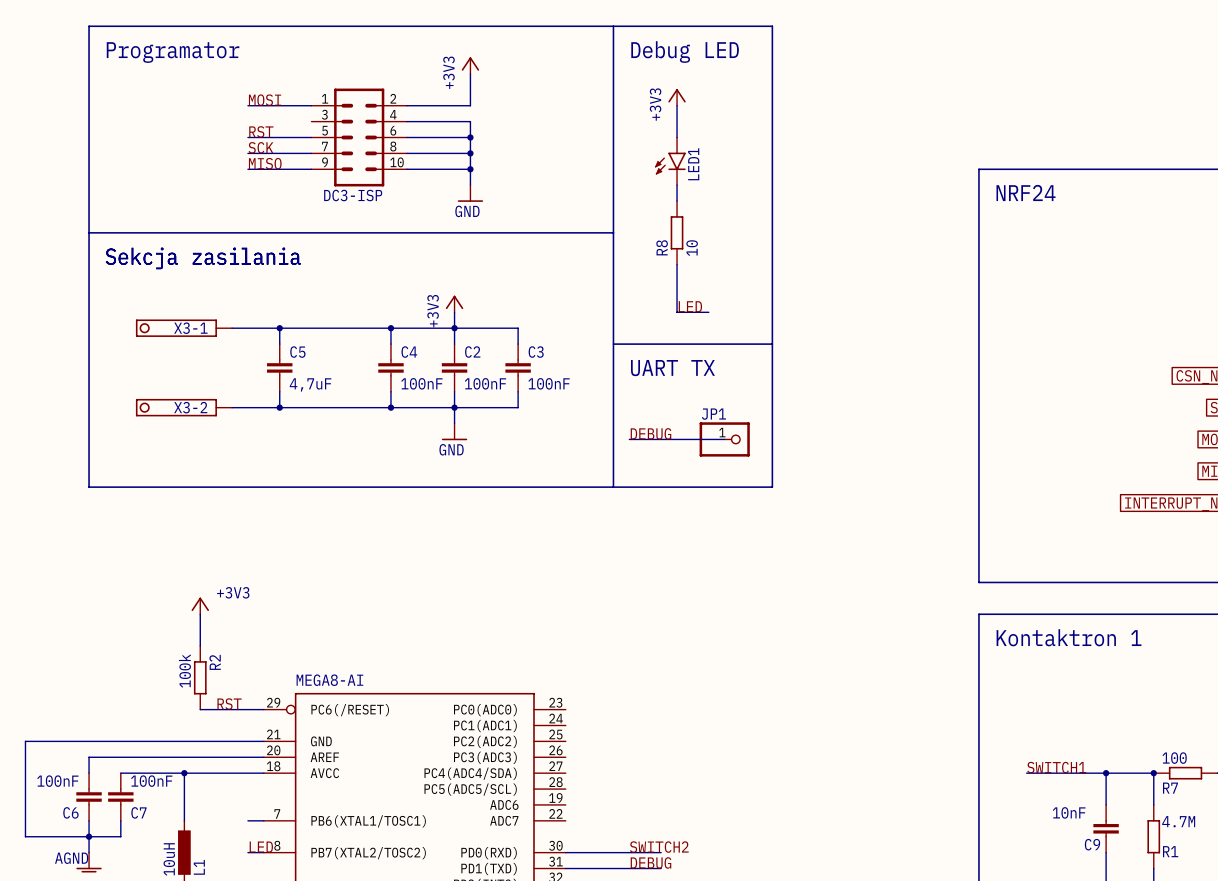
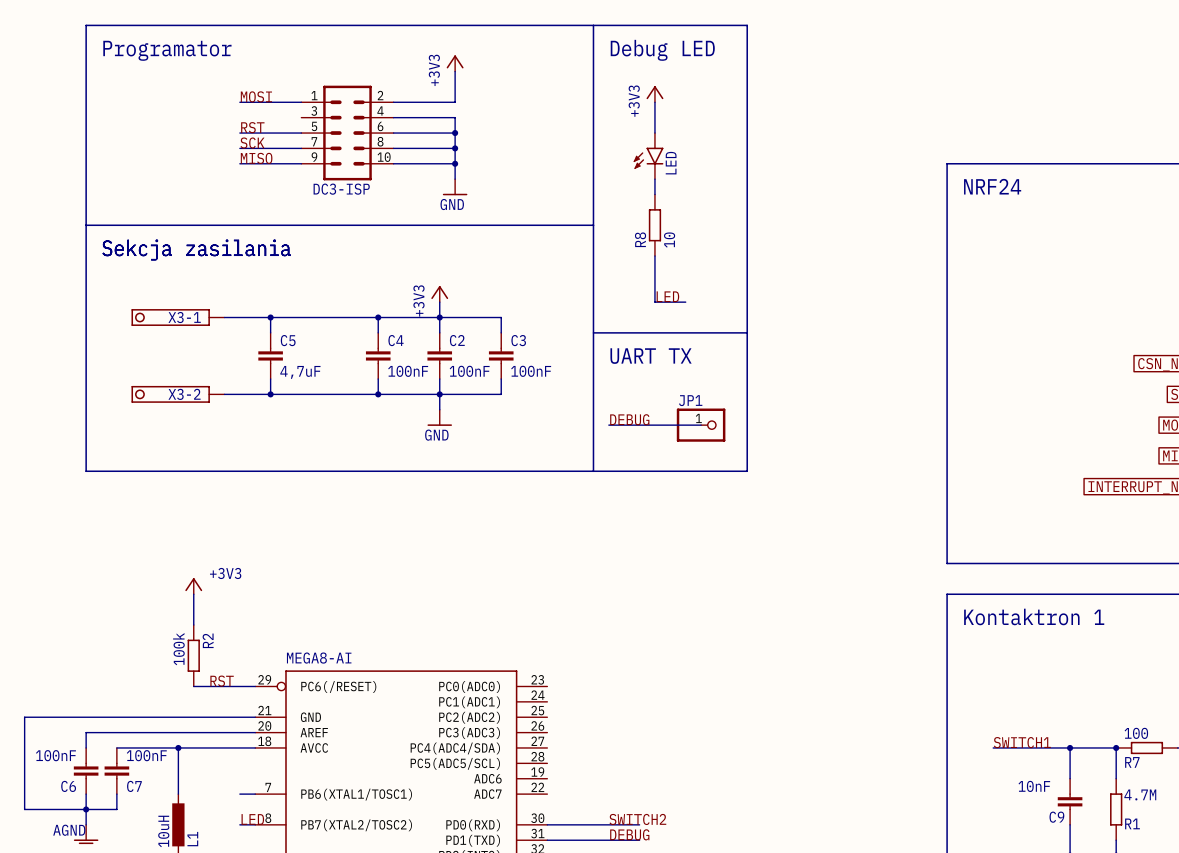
LED1 name: LED1 (693, 164) -> LED (671, 163)

